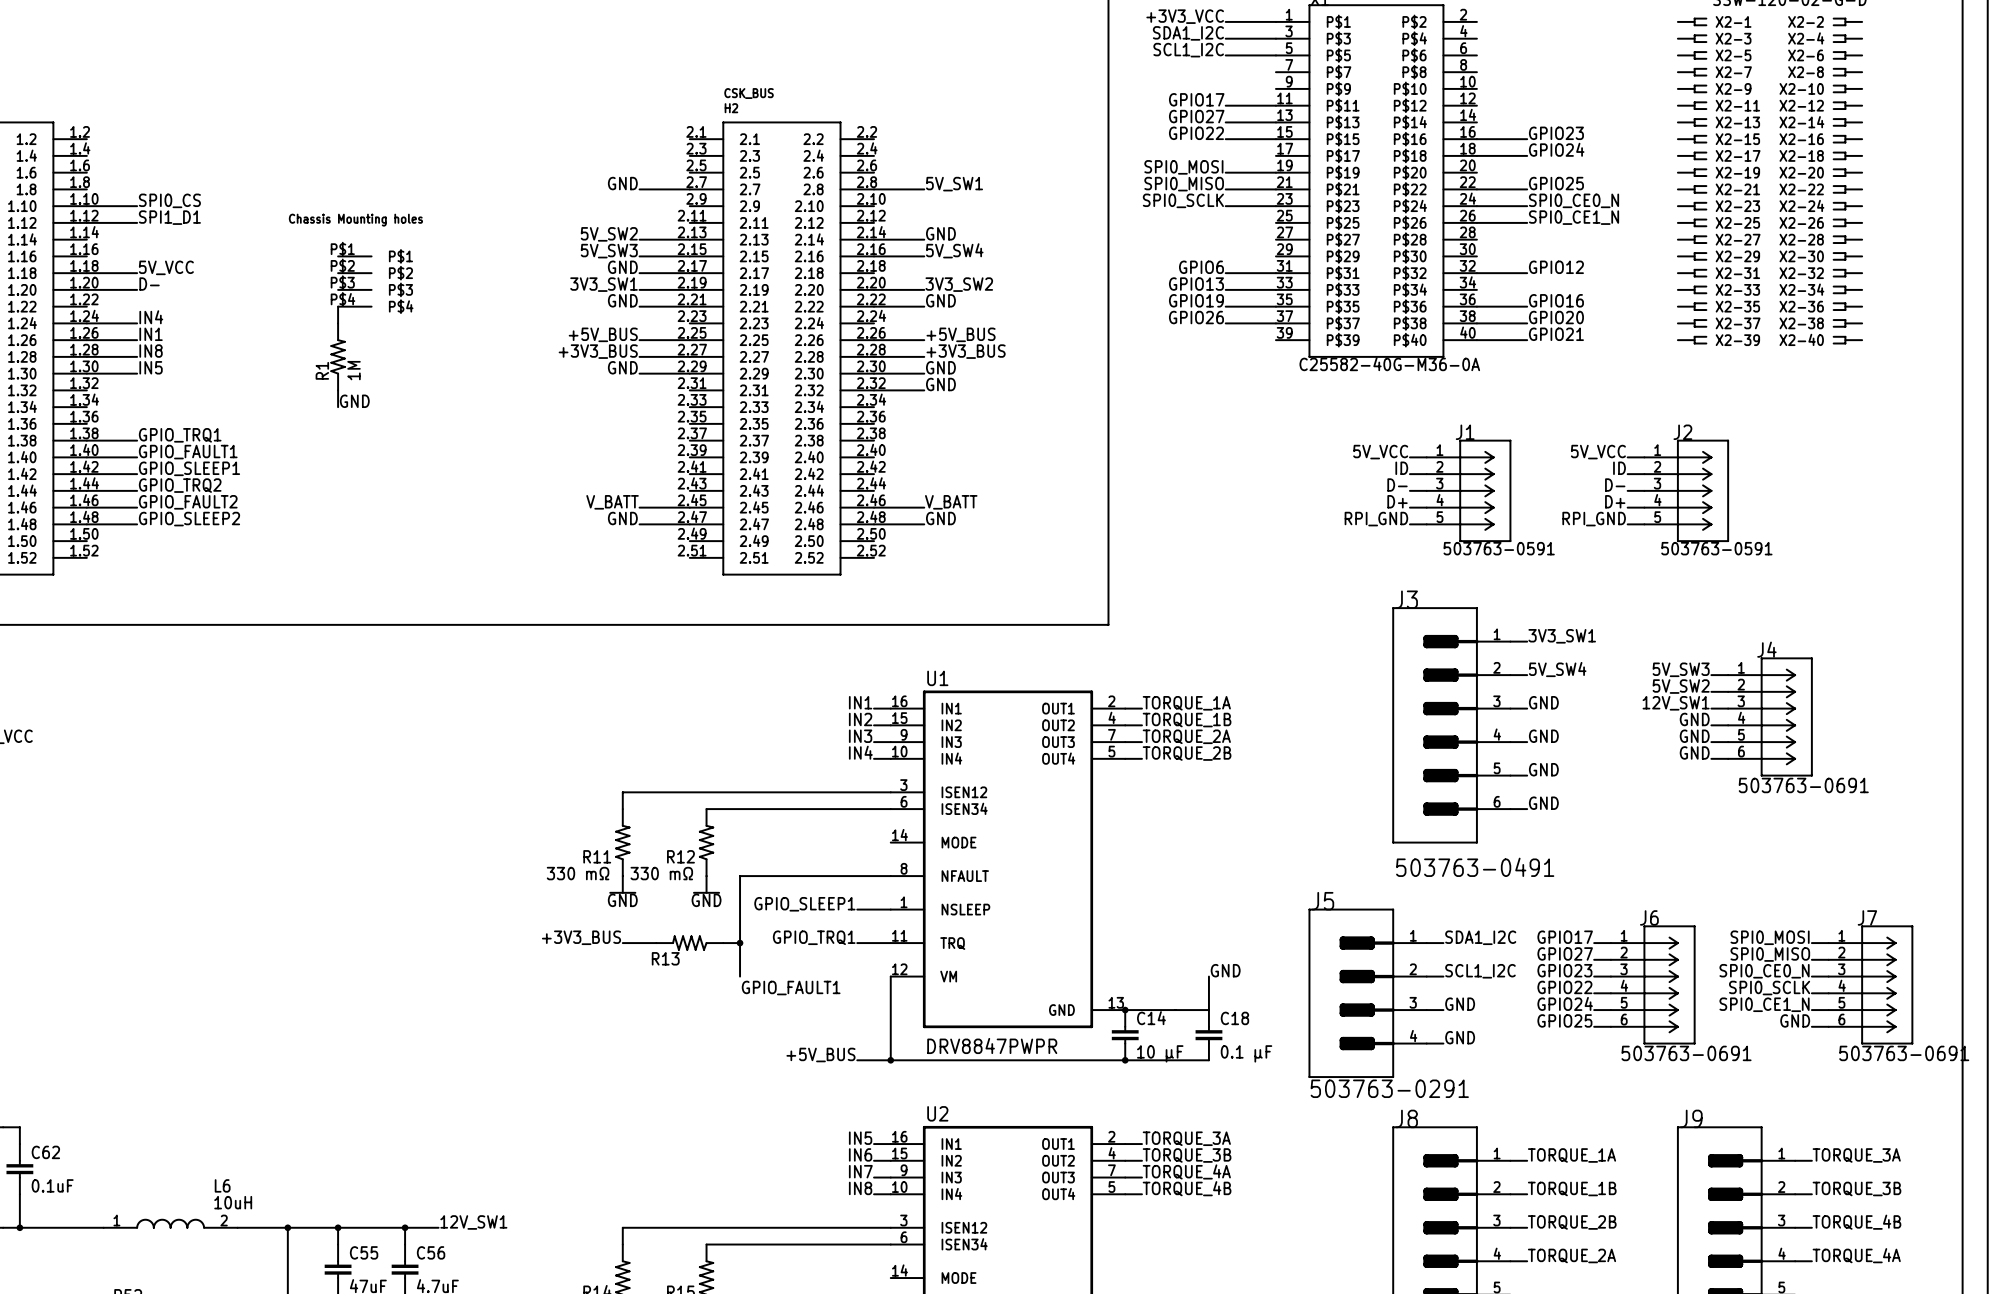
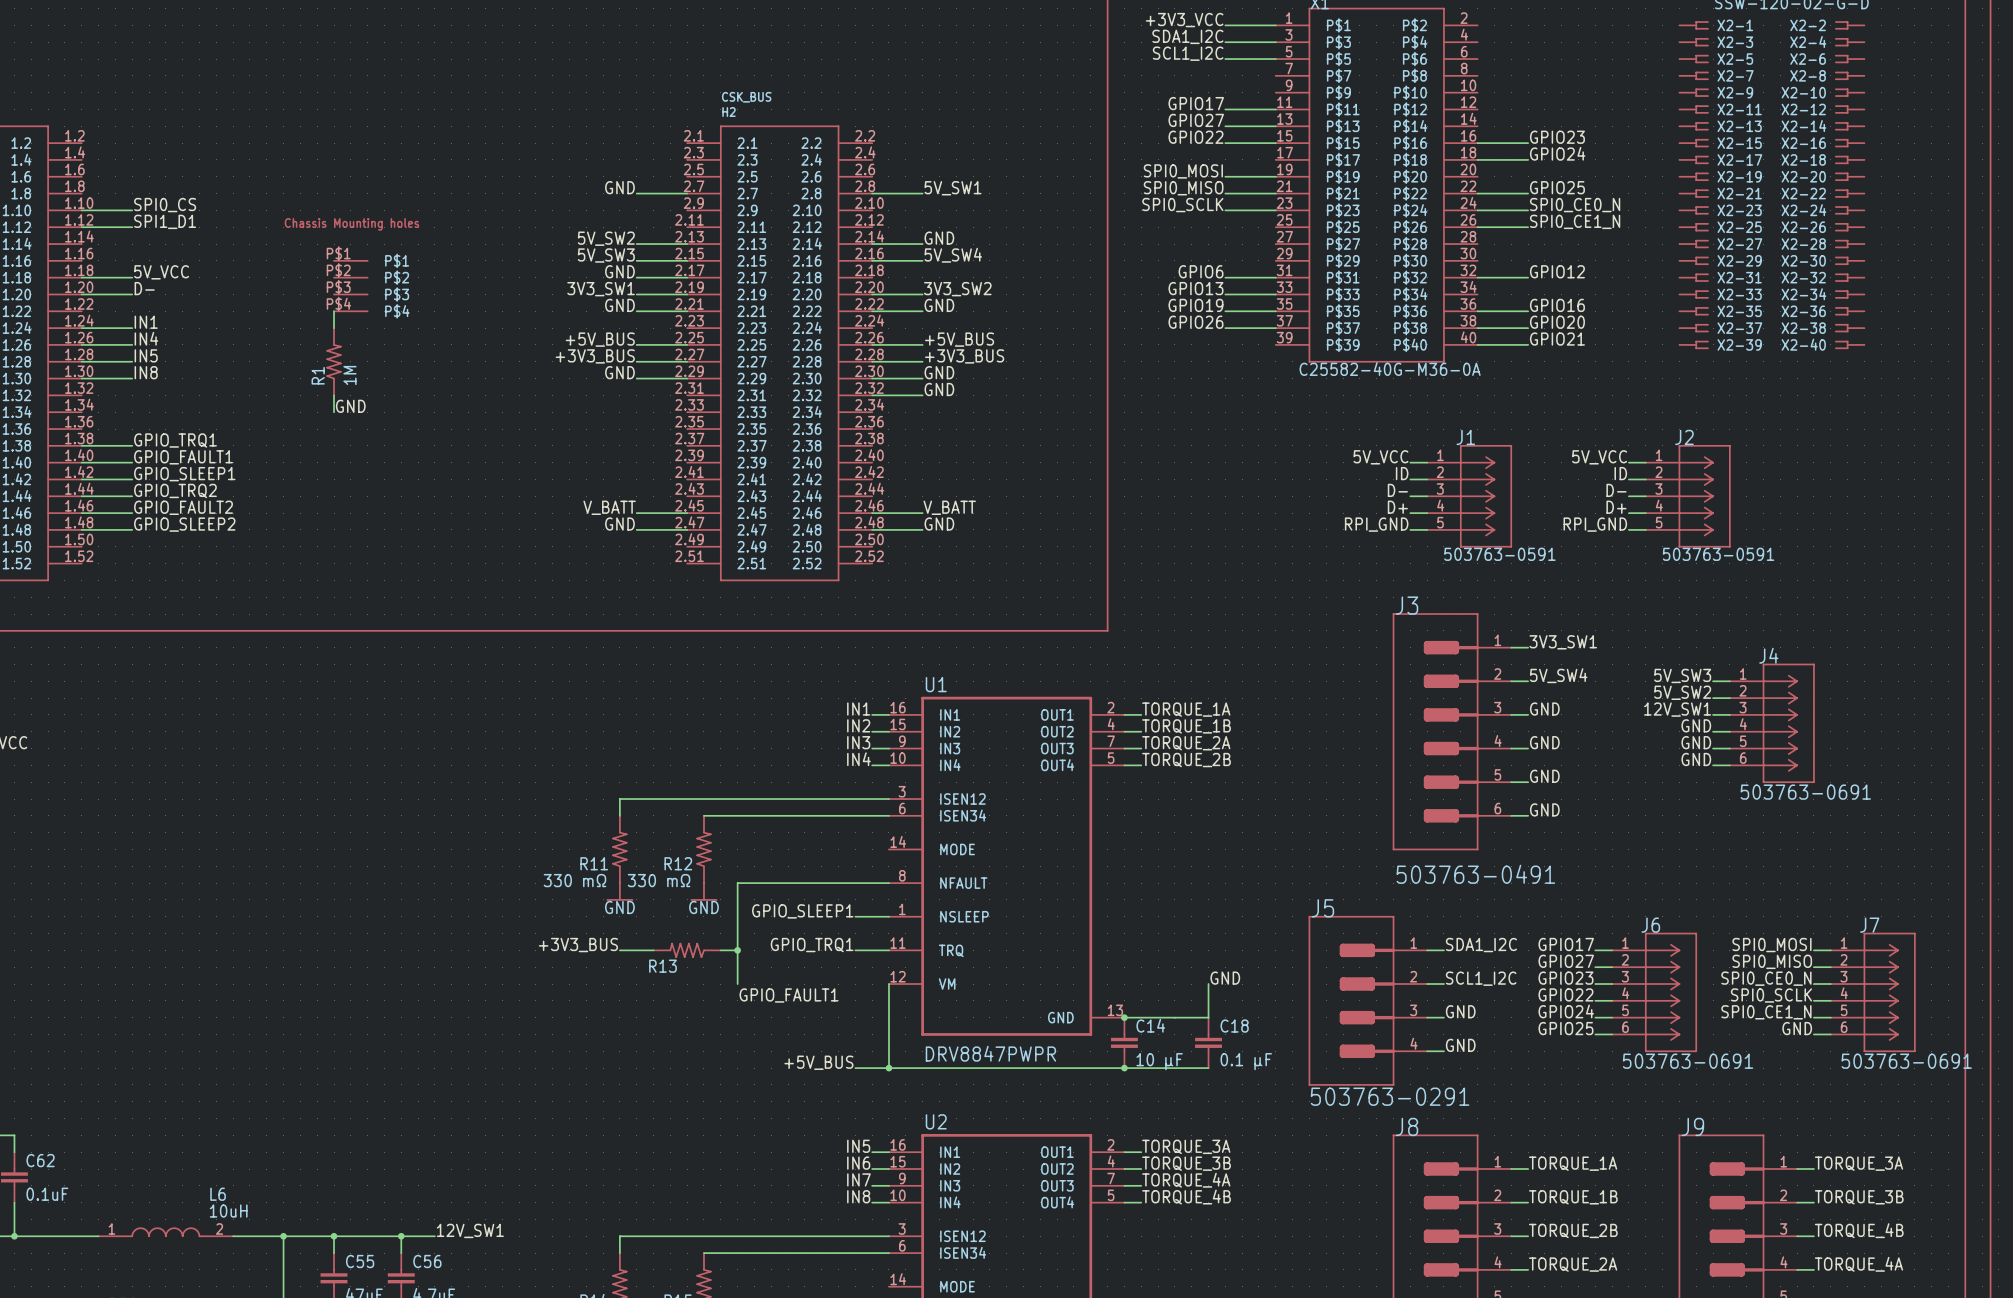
label: IN4 (151, 317) -> IN1 (146, 322)
label: IN1 (151, 334) -> IN4 (146, 338)
label: IN8 (151, 351) -> IN5 (146, 355)
label: IN5 (151, 367) -> IN8 (146, 372)

